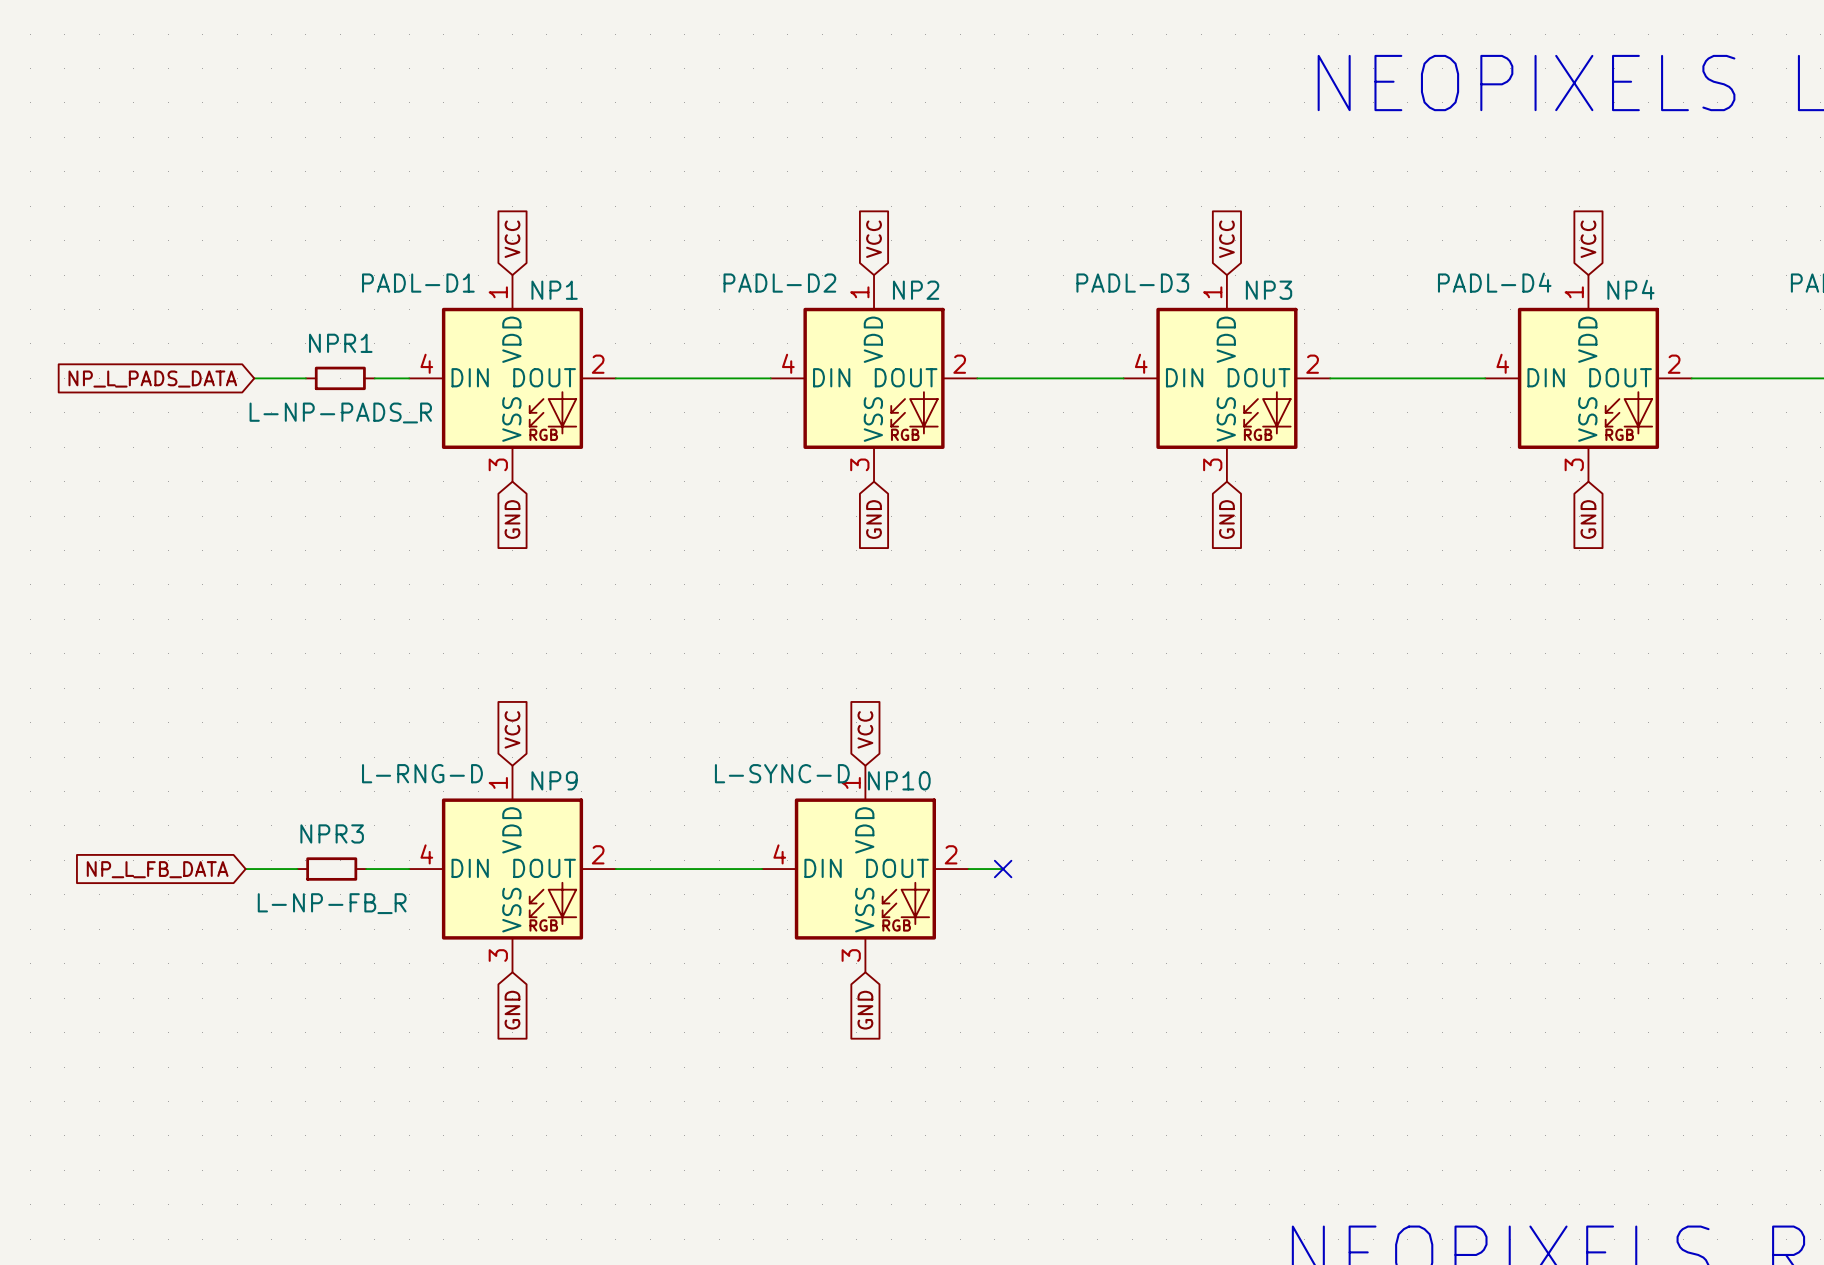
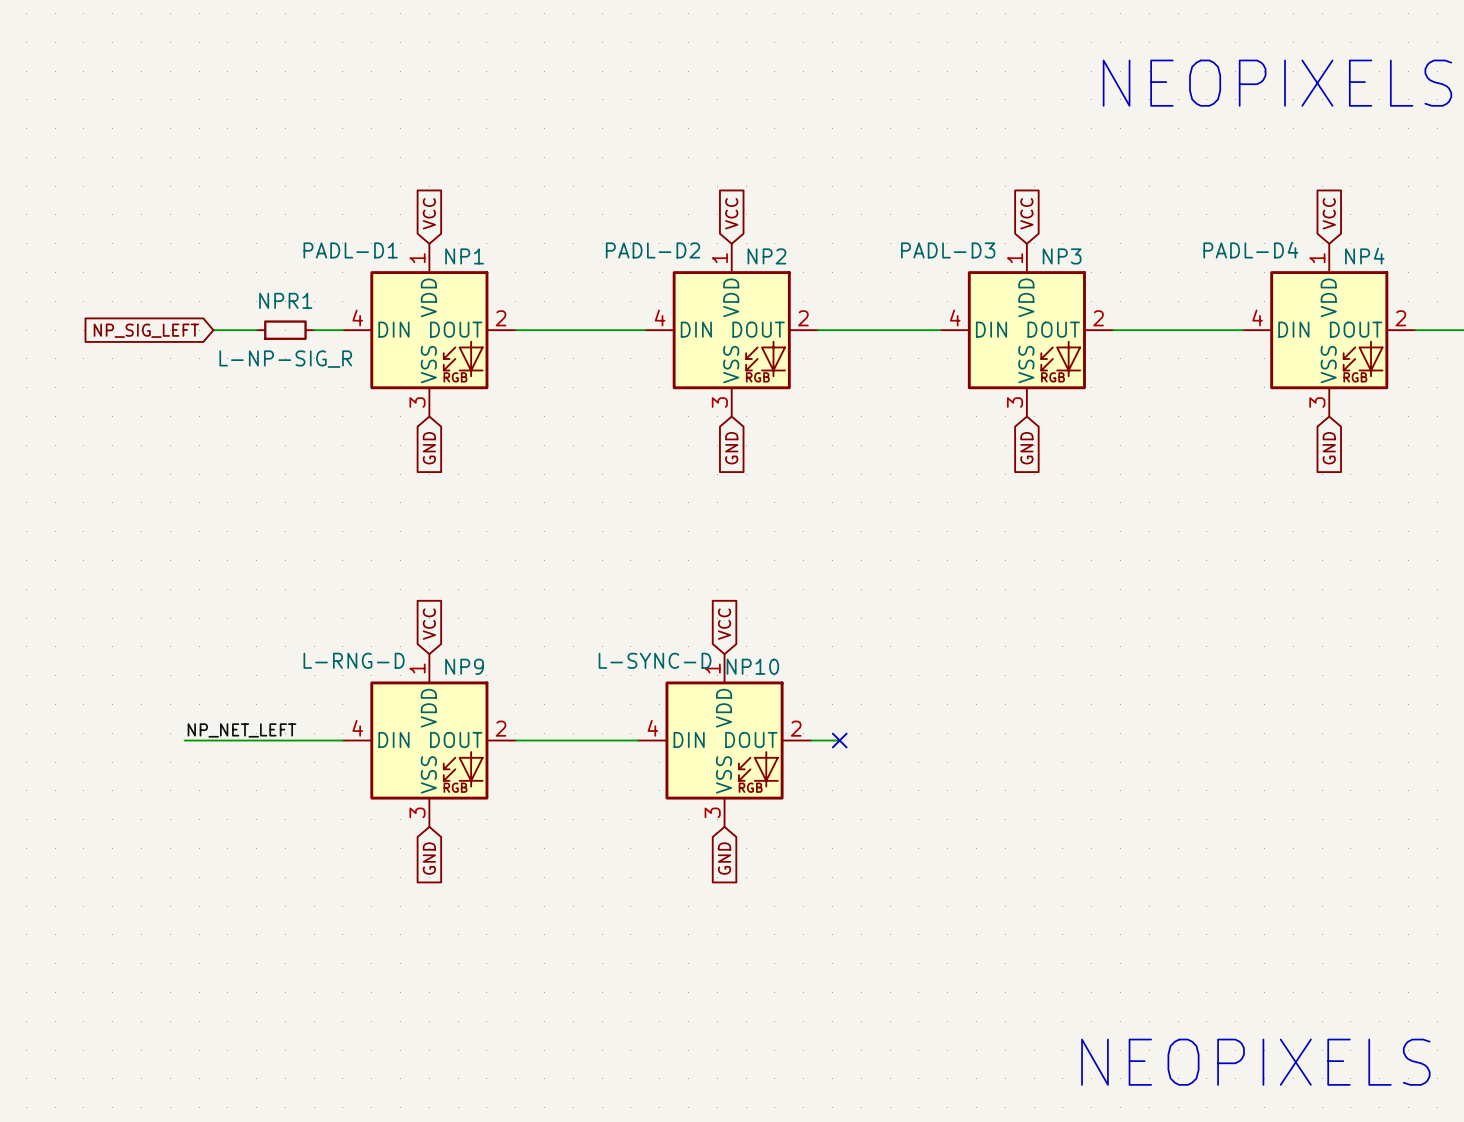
global label: NP_L_PADS_DATA (152, 379) -> NP_SIG_LEFT (146, 330)
NPR1 value: L-NP-PADS_R (340, 412) -> L-NP-SIG_R (285, 359)
label: none -> NP_NET_LEFT (241, 730)
global label: NP_L_FB_DATA (157, 869) -> none
wire: none -> (184, 740) (206, 740)
wire: none -> (249, 740) (307, 740)
NPR3: L-NP-FB_R (331, 869) -> none

